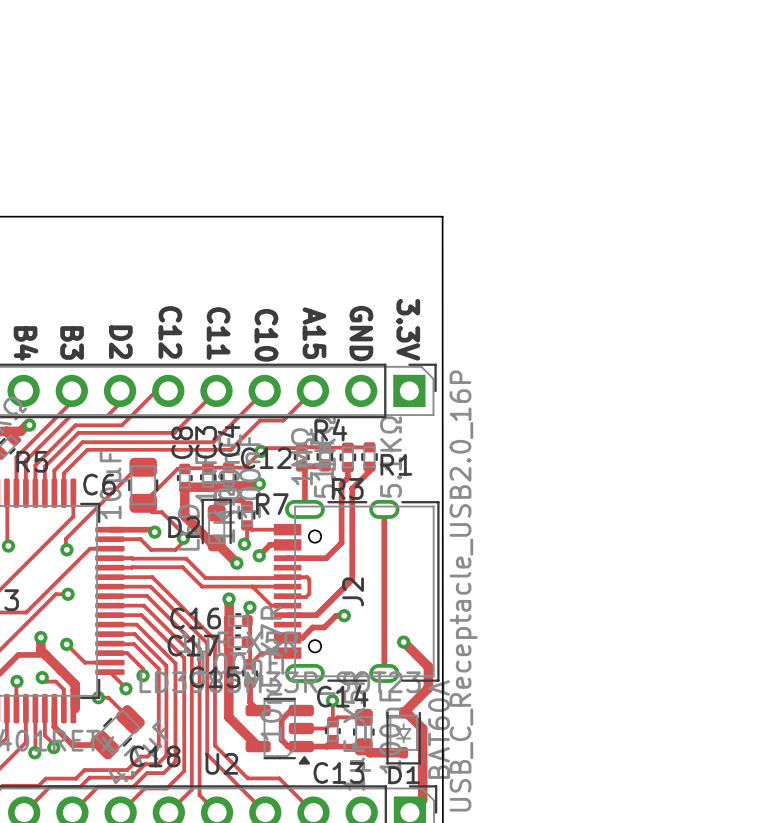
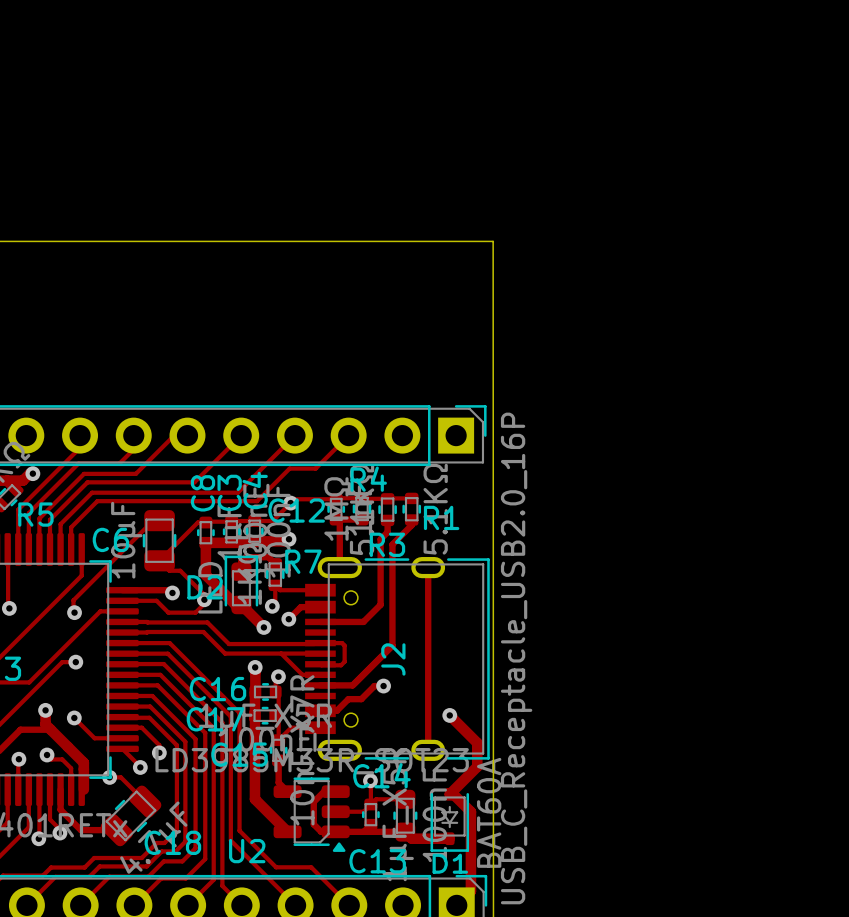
text: 3.3V (408, 329) -> none
text: C12 (170, 332) -> none
text: C11 (218, 333) -> none
text: A15 (314, 333) -> none
text: GND (361, 333) -> none
text: C10 (266, 335) -> none
text: D2 (120, 342) -> none
text: B4 (26, 343) -> none
text: B3 (72, 343) -> none

